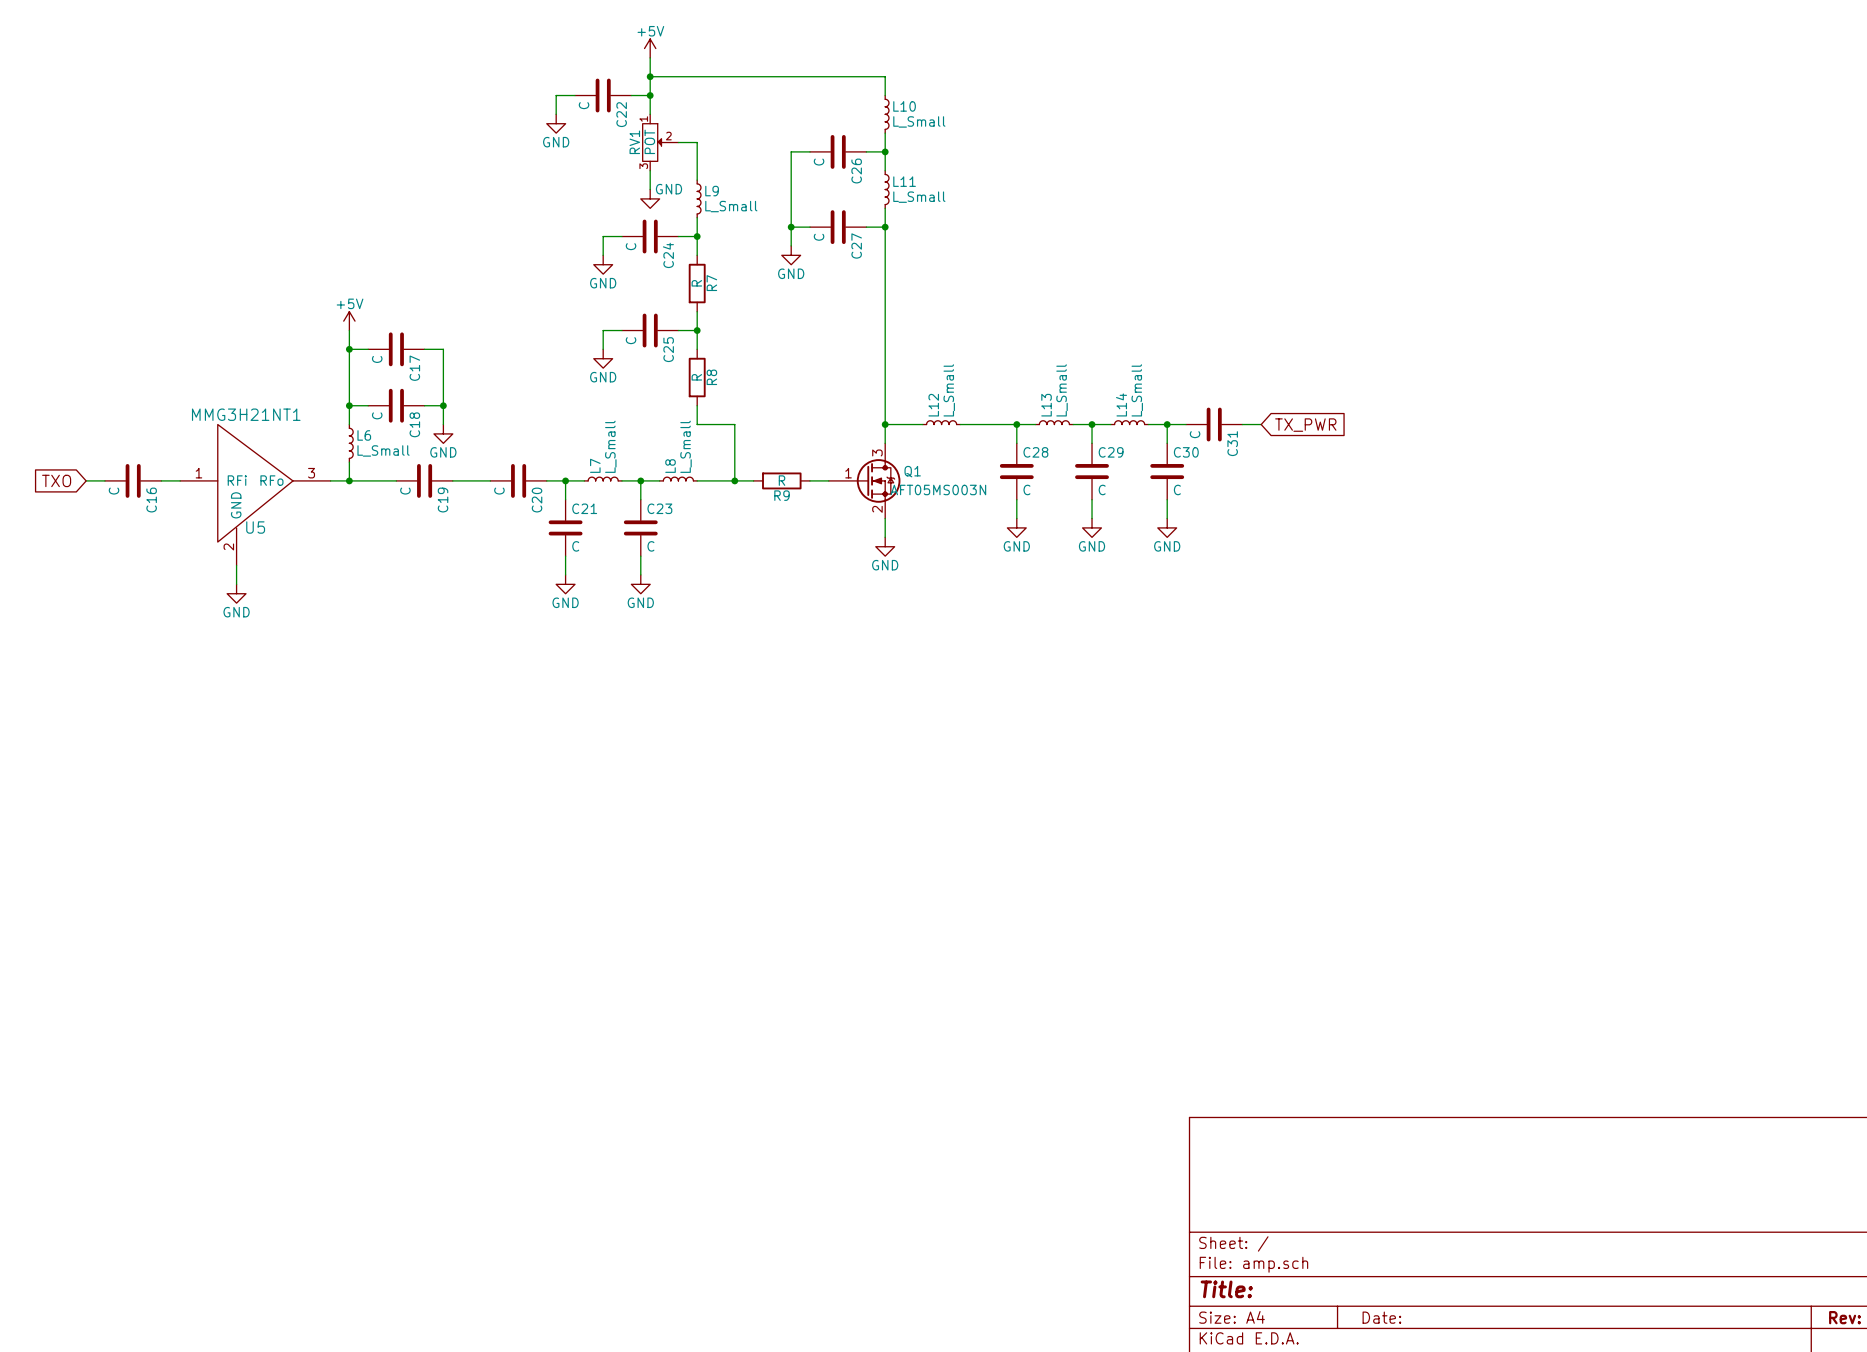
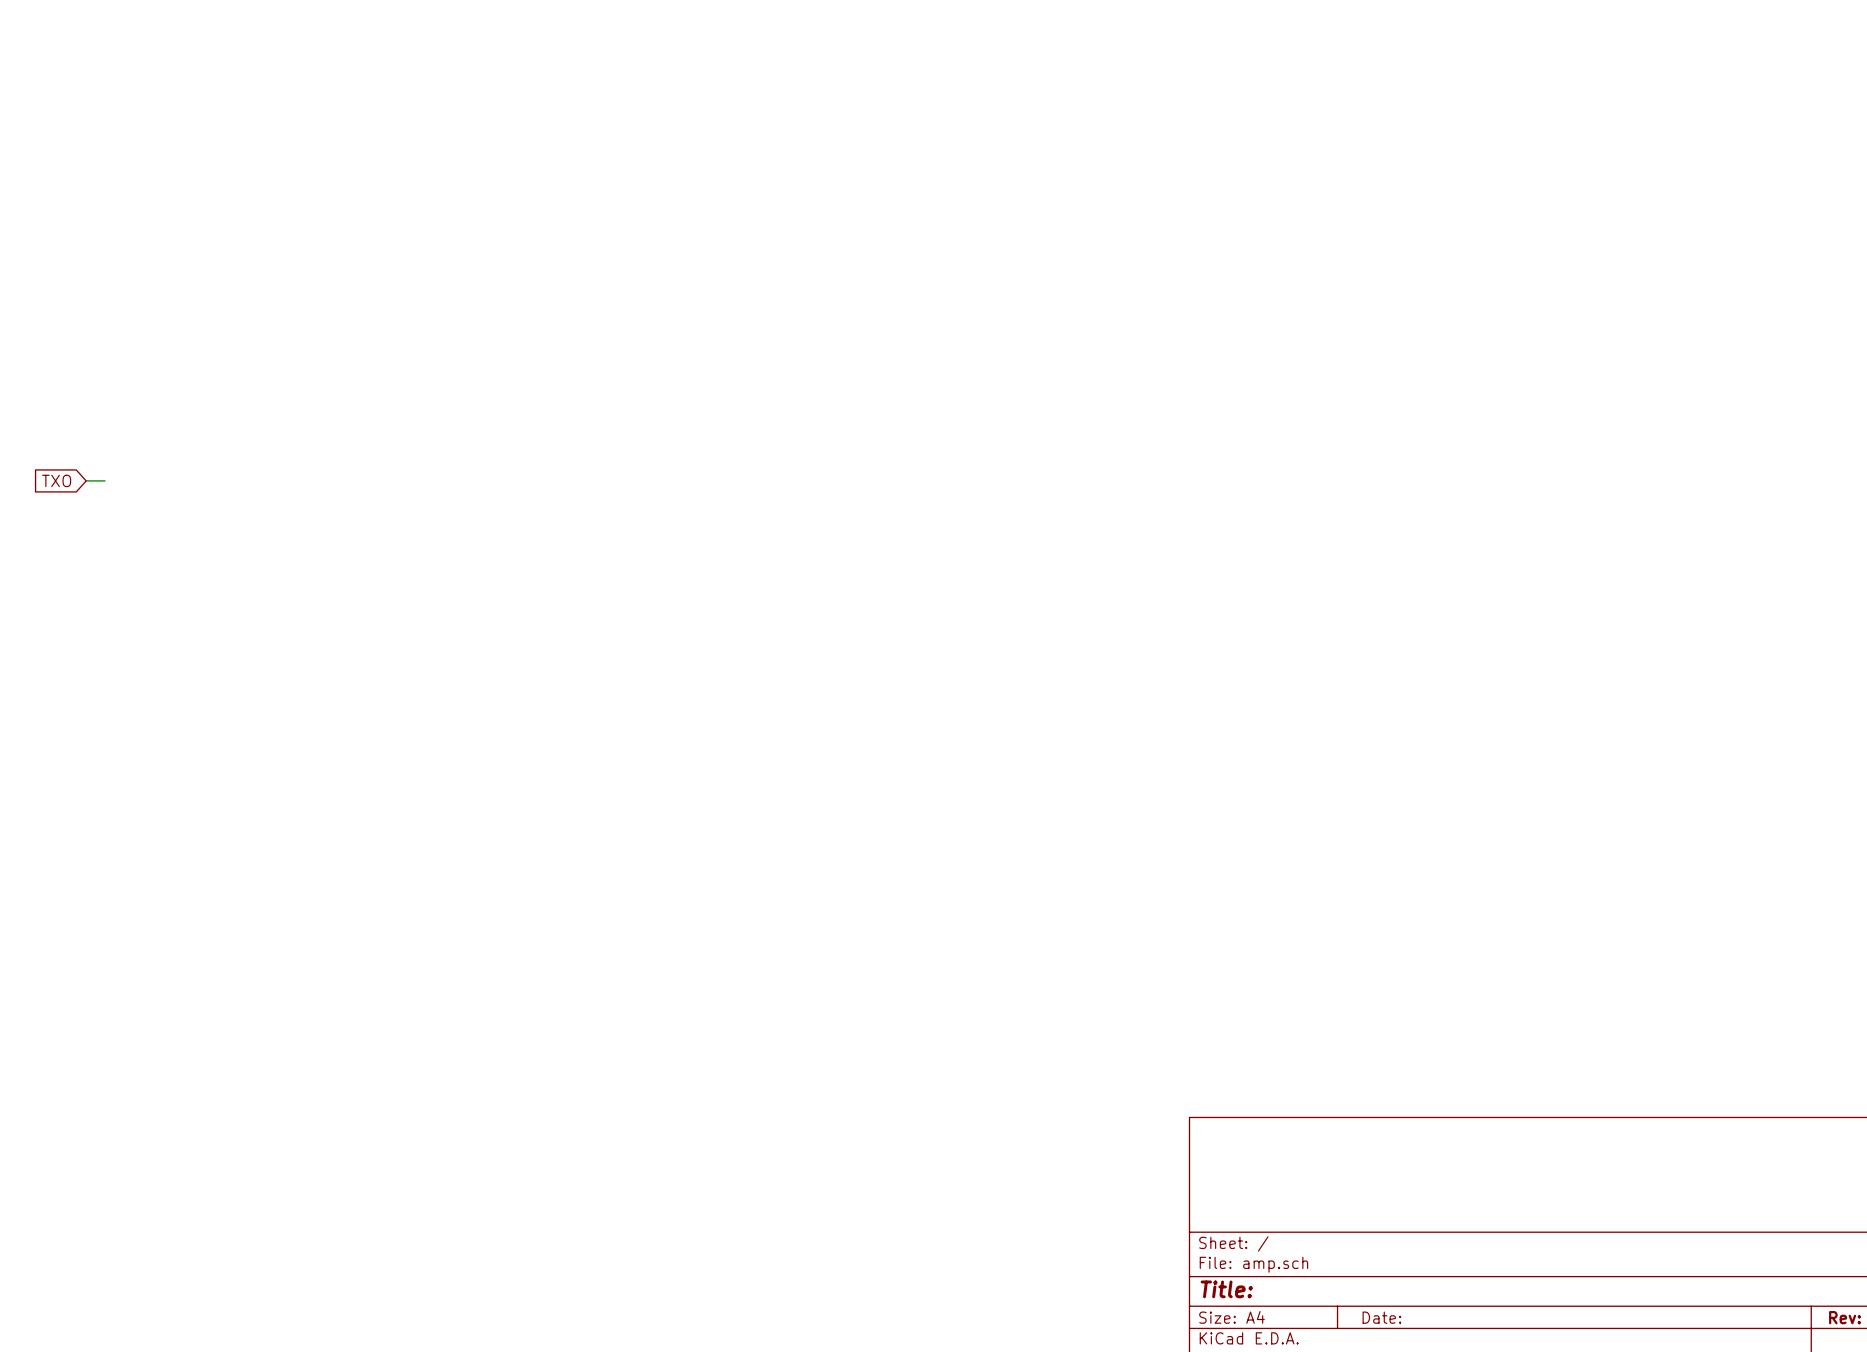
power symbol: +5V (650, 48) -> none
wire: (650, 57) (650, 114) -> none
wire: (650, 76) (885, 76) (885, 95) -> none
junction: (650, 76) -> none
wire: (574, 95) (556, 95) (556, 114) -> none
C22: C (603, 95) -> none
wire: (631, 95) (650, 95) -> none
junction: (650, 95) -> none
L10: L_Small (887, 114) -> none
power symbol: GND (556, 123) -> none
wire: (885, 133) (885, 170) -> none
RV1: POT (660, 142) -> none
wire: (678, 142) (697, 142) (697, 180) -> none
wire: (809, 151) (791, 151) (791, 245) -> none
C26: C (838, 151) -> none
wire: (866, 151) (885, 151) -> none
junction: (885, 151) -> none
wire: (650, 170) (650, 189) -> none
L11: L_Small (887, 189) -> none
power symbol: GND (650, 198) -> none
L9: L_Small (699, 198) -> none
wire: (885, 208) (885, 443) -> none
wire: (697, 217) (697, 255) -> none
wire: (791, 227) (809, 227) -> none
junction: (791, 227) -> none
C27: C (838, 227) -> none
wire: (866, 227) (885, 227) -> none
junction: (885, 227) -> none
wire: (621, 236) (603, 236) (603, 255) -> none
C24: C (650, 236) -> none
wire: (678, 236) (697, 236) -> none
junction: (697, 236) -> none
power symbol: GND (791, 255) -> none
power symbol: GND (603, 264) -> none
R7: R (697, 283) -> none
wire: (697, 311) (697, 349) -> none
power symbol: +5V (349, 321) -> none
wire: (349, 330) (349, 424) -> none
wire: (621, 330) (603, 330) (603, 349) -> none
C25: C (650, 330) -> none
wire: (678, 330) (697, 330) -> none
junction: (697, 330) -> none
wire: (349, 349) (368, 349) -> none
junction: (349, 349) -> none
C17: C (396, 349) -> none
wire: (424, 349) (443, 349) (443, 424) -> none
power symbol: GND (603, 358) -> none
R8: R (697, 377) -> none
wire: (349, 405) (368, 405) -> none
junction: (349, 405) -> none
C18: C (396, 405) -> none
wire: (424, 405) (443, 405) -> none
junction: (443, 405) -> none
wire: (697, 405) (697, 424) (734, 424) (734, 480) -> none
L12: L_Small (941, 422) -> none
L13: L_Small (1054, 422) -> none
L14: L_Small (1129, 422) -> none
wire: (885, 424) (922, 424) -> none
junction: (885, 424) -> none
wire: (960, 424) (1035, 424) -> none
wire: (1016, 424) (1016, 443) -> none
junction: (1016, 424) -> none
wire: (1073, 424) (1110, 424) -> none
wire: (1092, 424) (1092, 443) -> none
junction: (1092, 424) -> none
wire: (1148, 424) (1186, 424) -> none
wire: (1167, 424) (1167, 443) -> none
junction: (1167, 424) -> none
C31: C (1214, 424) -> none
wire: (1242, 424) (1261, 424) -> none
global label: TX_PWR (1305, 425) -> none
power symbol: GND (443, 433) -> none
L6: L_Small (351, 443) -> none
wire: (349, 462) (349, 480) -> none
C28: C (1016, 471) -> none
C29: C (1092, 471) -> none
C30: C (1167, 471) -> none
L7: L_Small (603, 479) -> none
L8: L_Small (678, 479) -> none
C16: C (133, 480) -> none
wire: (161, 480) (180, 480) -> none
wire: (330, 480) (396, 480) -> none
junction: (349, 480) -> none
C19: C (424, 480) -> none
wire: (452, 480) (490, 480) -> none
C20: C (518, 480) -> none
wire: (546, 480) (584, 480) -> none
wire: (565, 480) (565, 499) -> none
junction: (565, 480) -> none
wire: (621, 480) (659, 480) -> none
wire: (640, 480) (640, 499) -> none
junction: (640, 480) -> none
wire: (697, 480) (753, 480) -> none
junction: (734, 480) -> none
R9: R (781, 480) -> none
wire: (809, 480) (828, 480) -> none
Q1: AFT05MS003N (864, 480) -> none
U5: MMG3H21NT1 (255, 495) -> none
wire: (1016, 499) (1016, 518) -> none
wire: (1092, 499) (1092, 518) -> none
wire: (1167, 499) (1167, 518) -> none
wire: (885, 518) (885, 537) -> none
C21: C (565, 527) -> none
C23: C (640, 527) -> none
power symbol: GND (1016, 527) -> none
power symbol: GND (1092, 527) -> none
power symbol: GND (1167, 527) -> none
power symbol: GND (885, 546) -> none
wire: (565, 556) (565, 574) -> none
wire: (640, 556) (640, 574) -> none
wire: (236, 565) (236, 584) -> none
power symbol: GND (565, 584) -> none
power symbol: GND (640, 584) -> none
power symbol: GND (236, 593) -> none

